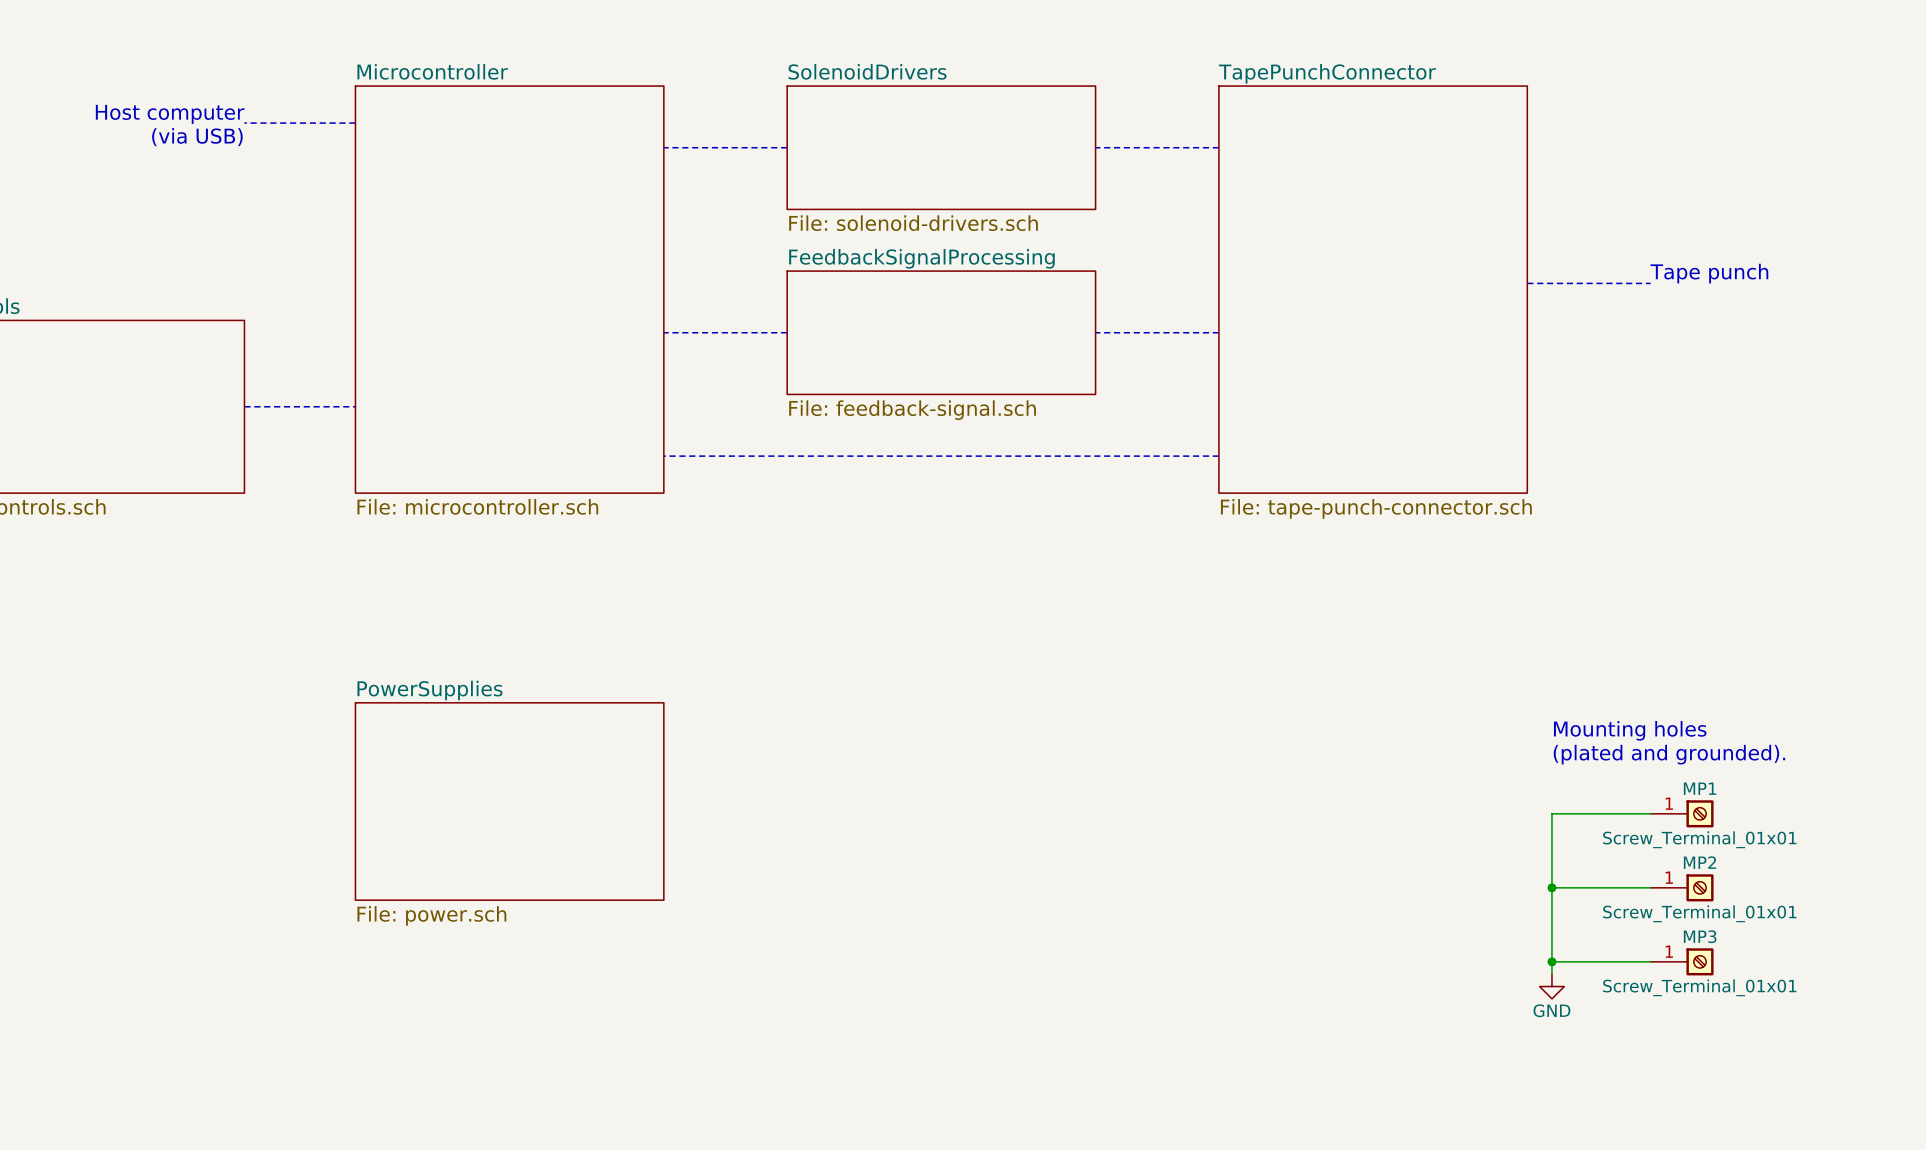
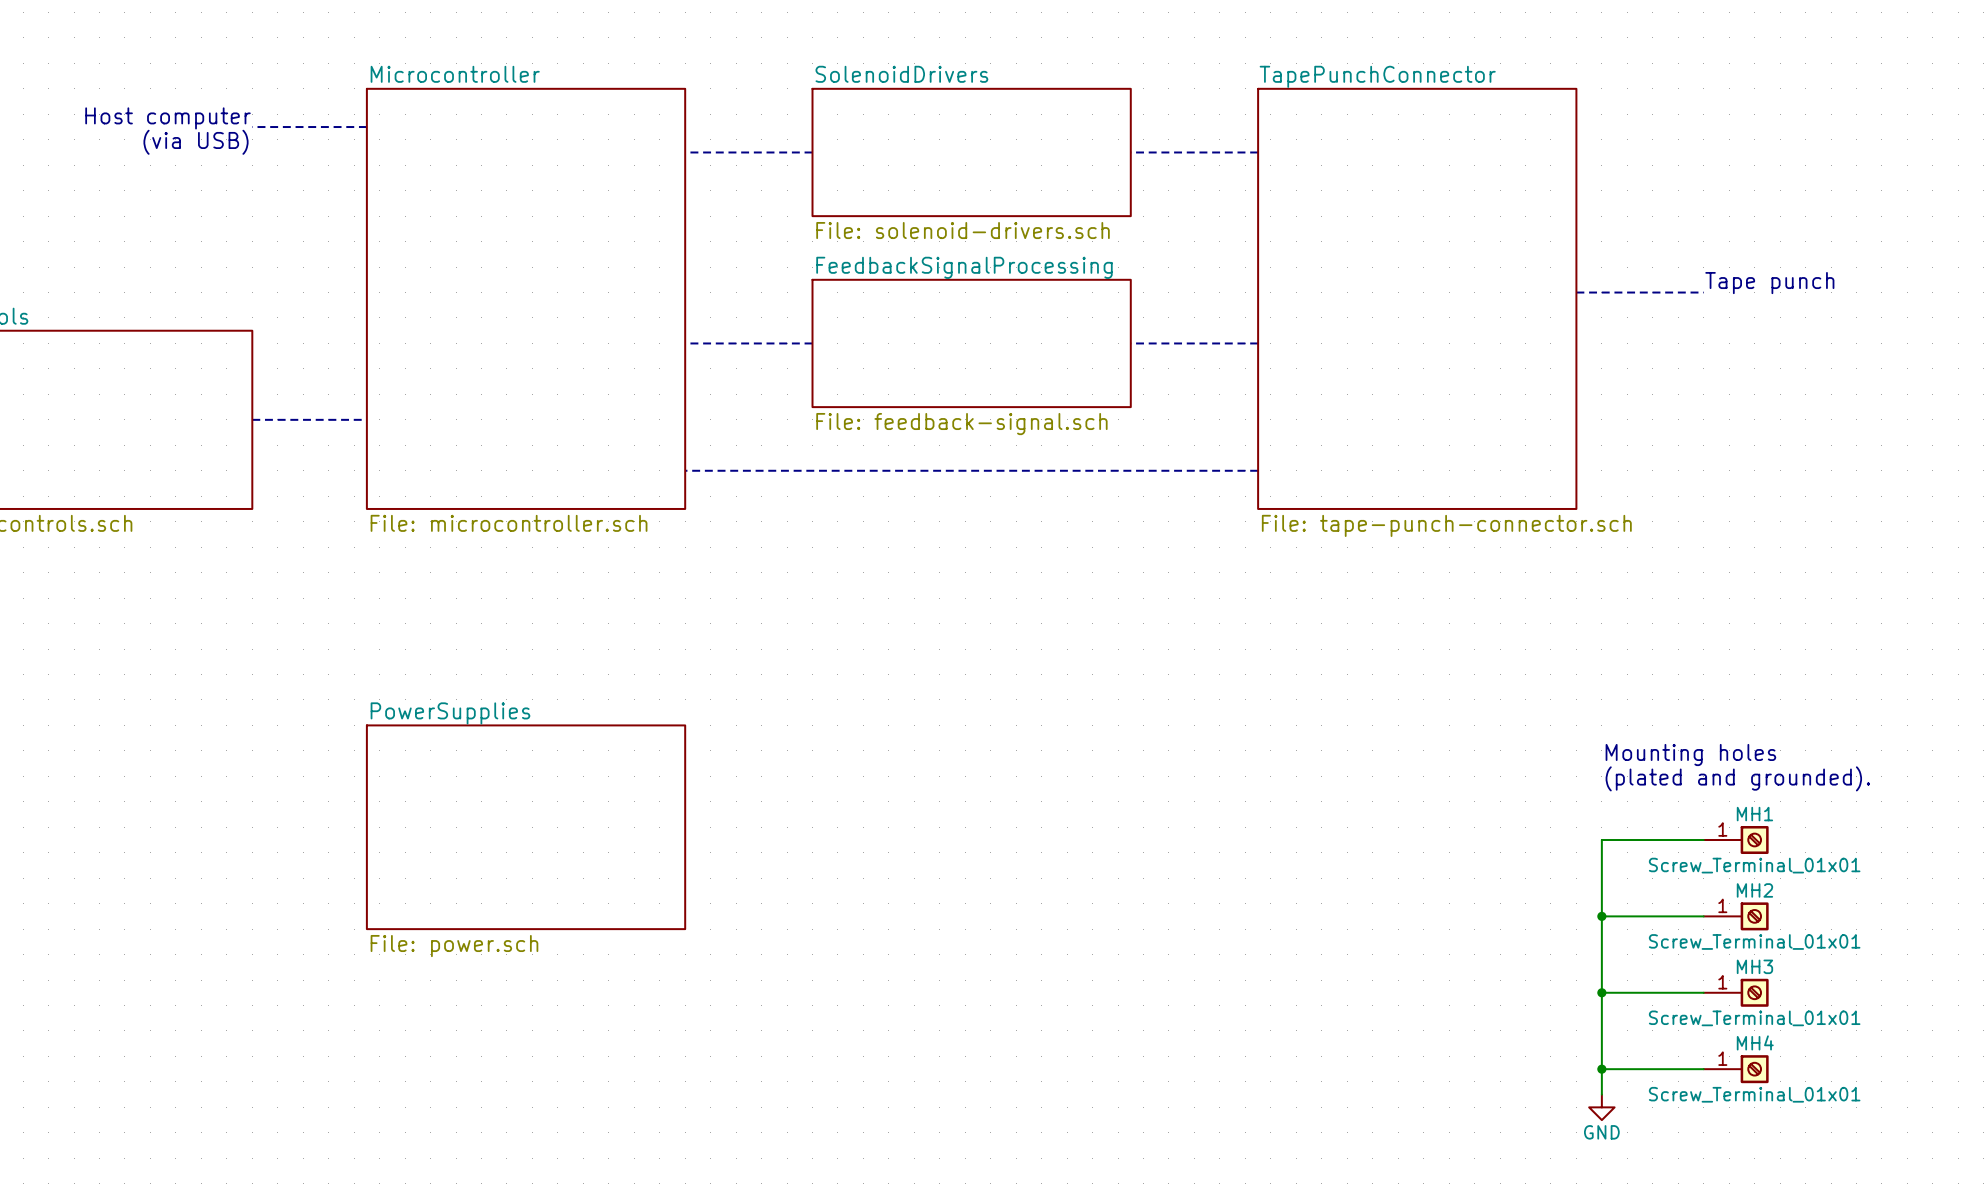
MP1 name: MP1 (1700, 788) -> MH1 (1754, 814)
MP2 name: MP2 (1699, 862) -> MH2 (1754, 890)
MP3 name: MP3 (1700, 936) -> MH3 (1754, 966)
wire: none -> (1601, 1005) (1601, 1094)
power symbol position: GND (1551, 986) -> GND (1601, 1107)
wire: none -> (1601, 1069) (1703, 1069)
junction: none -> (1601, 1069)
MH4: none -> Screw_Terminal_01x01 (1736, 1069)

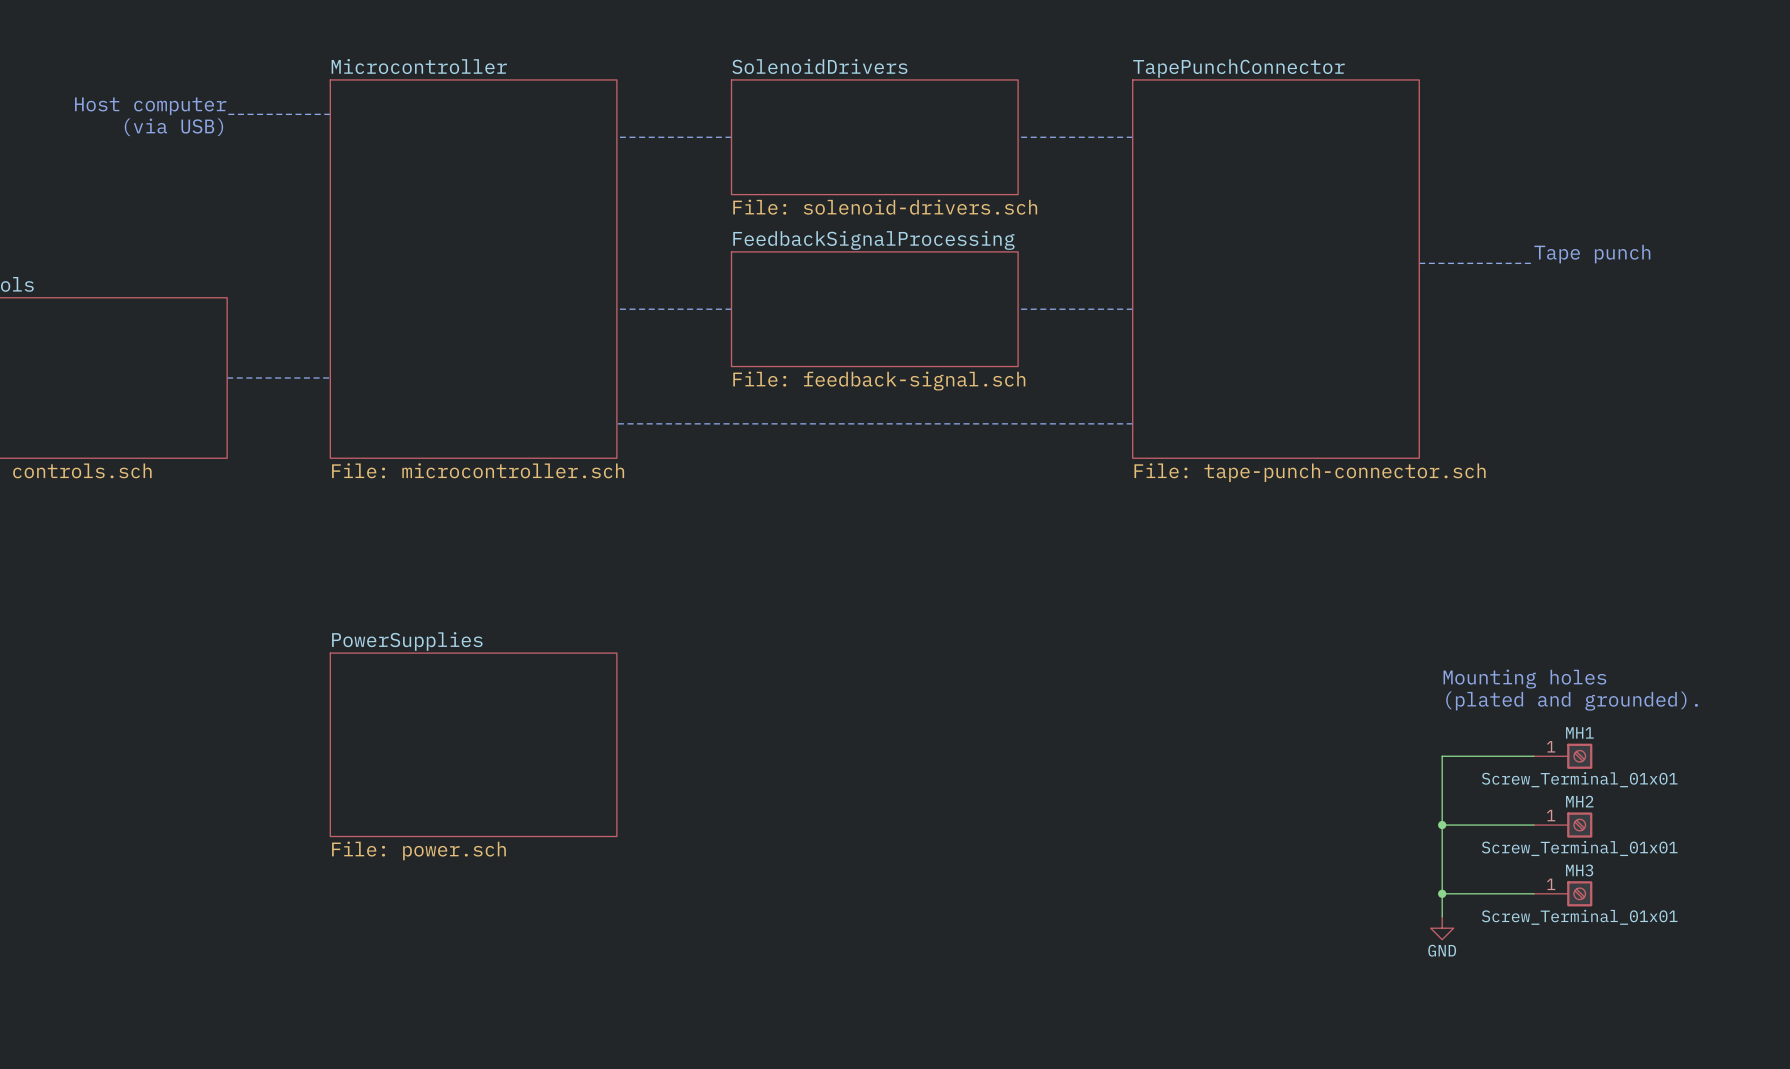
wire: (1601, 1018) (1601, 1094) -> none
wire: (1601, 1069) (1703, 1069) -> none
junction: (1601, 1069) -> none
MH4: Screw_Terminal_01x01 (1736, 1069) -> none
power symbol position: GND (1601, 1107) -> GND (1442, 928)

